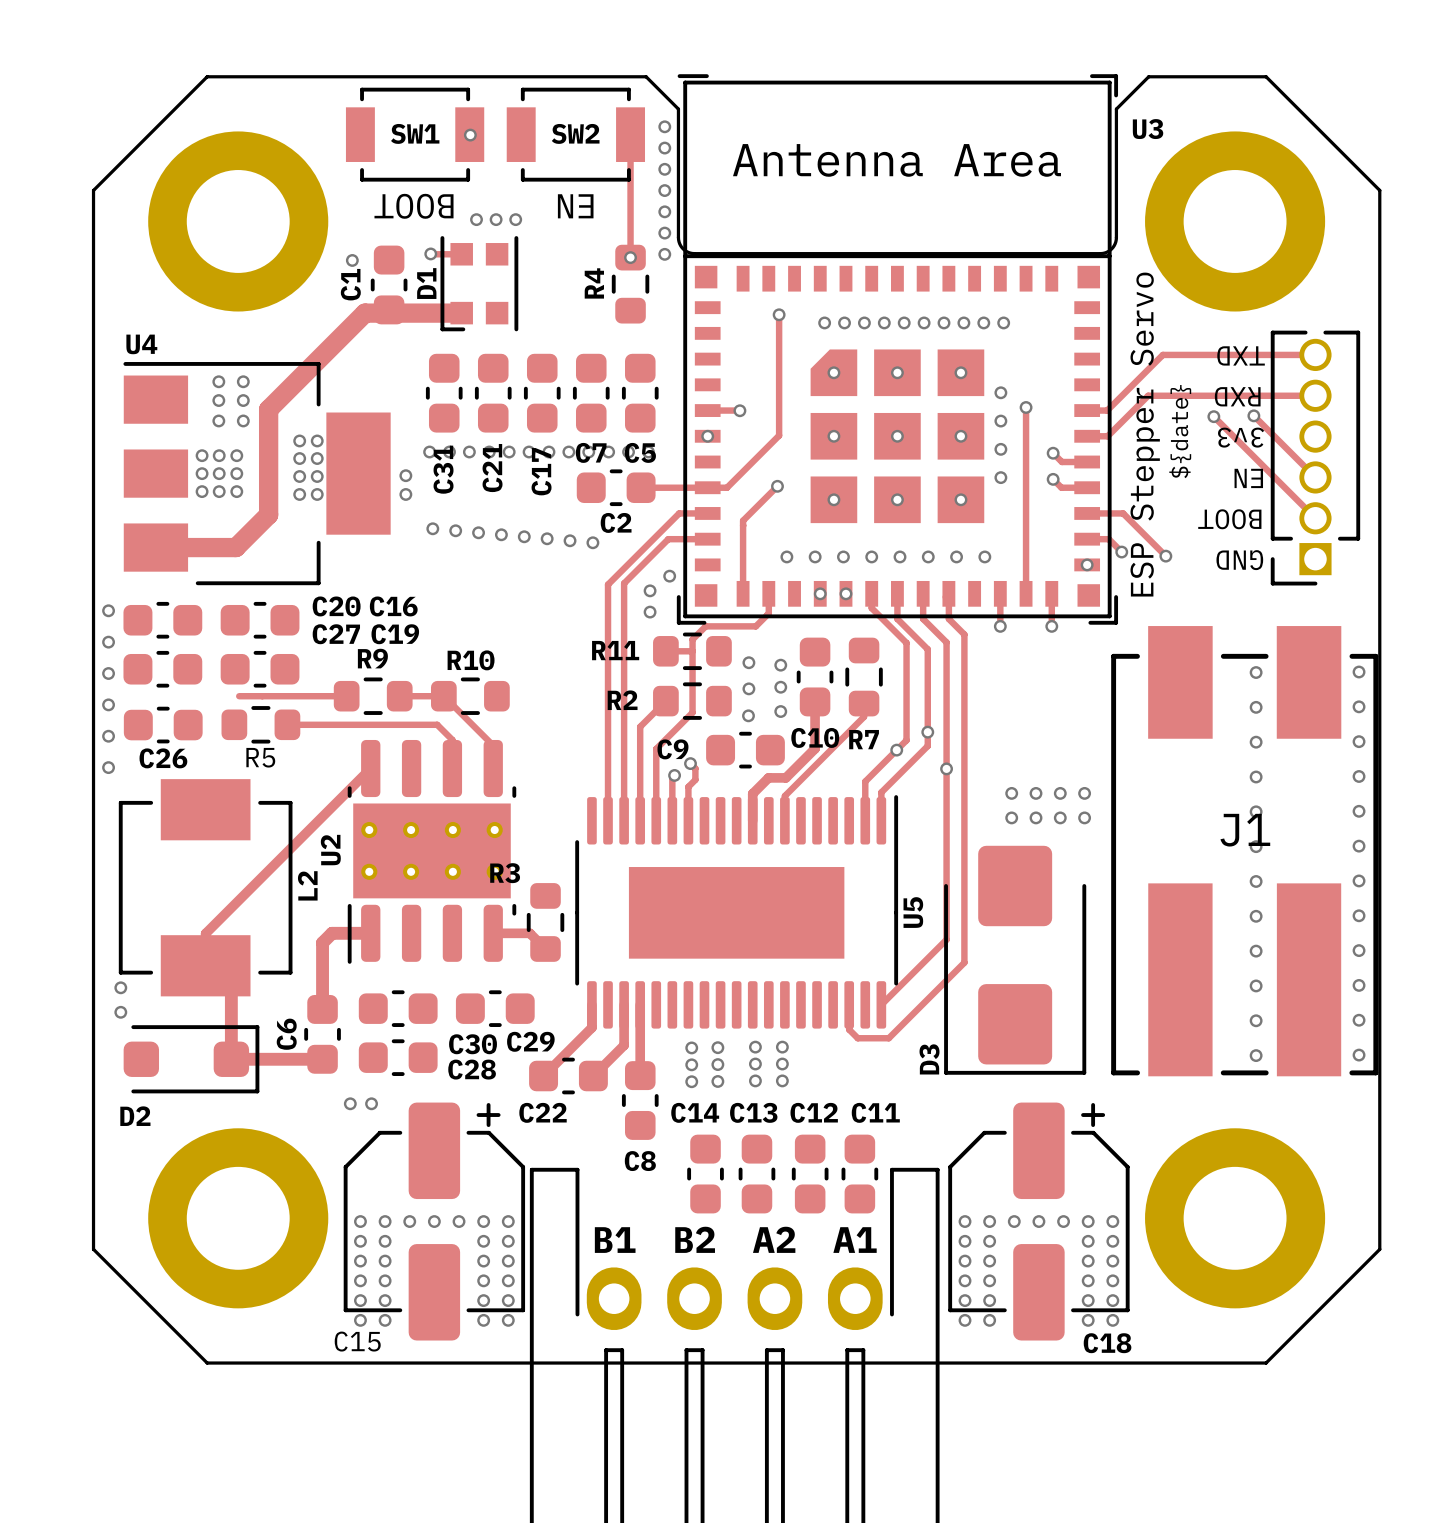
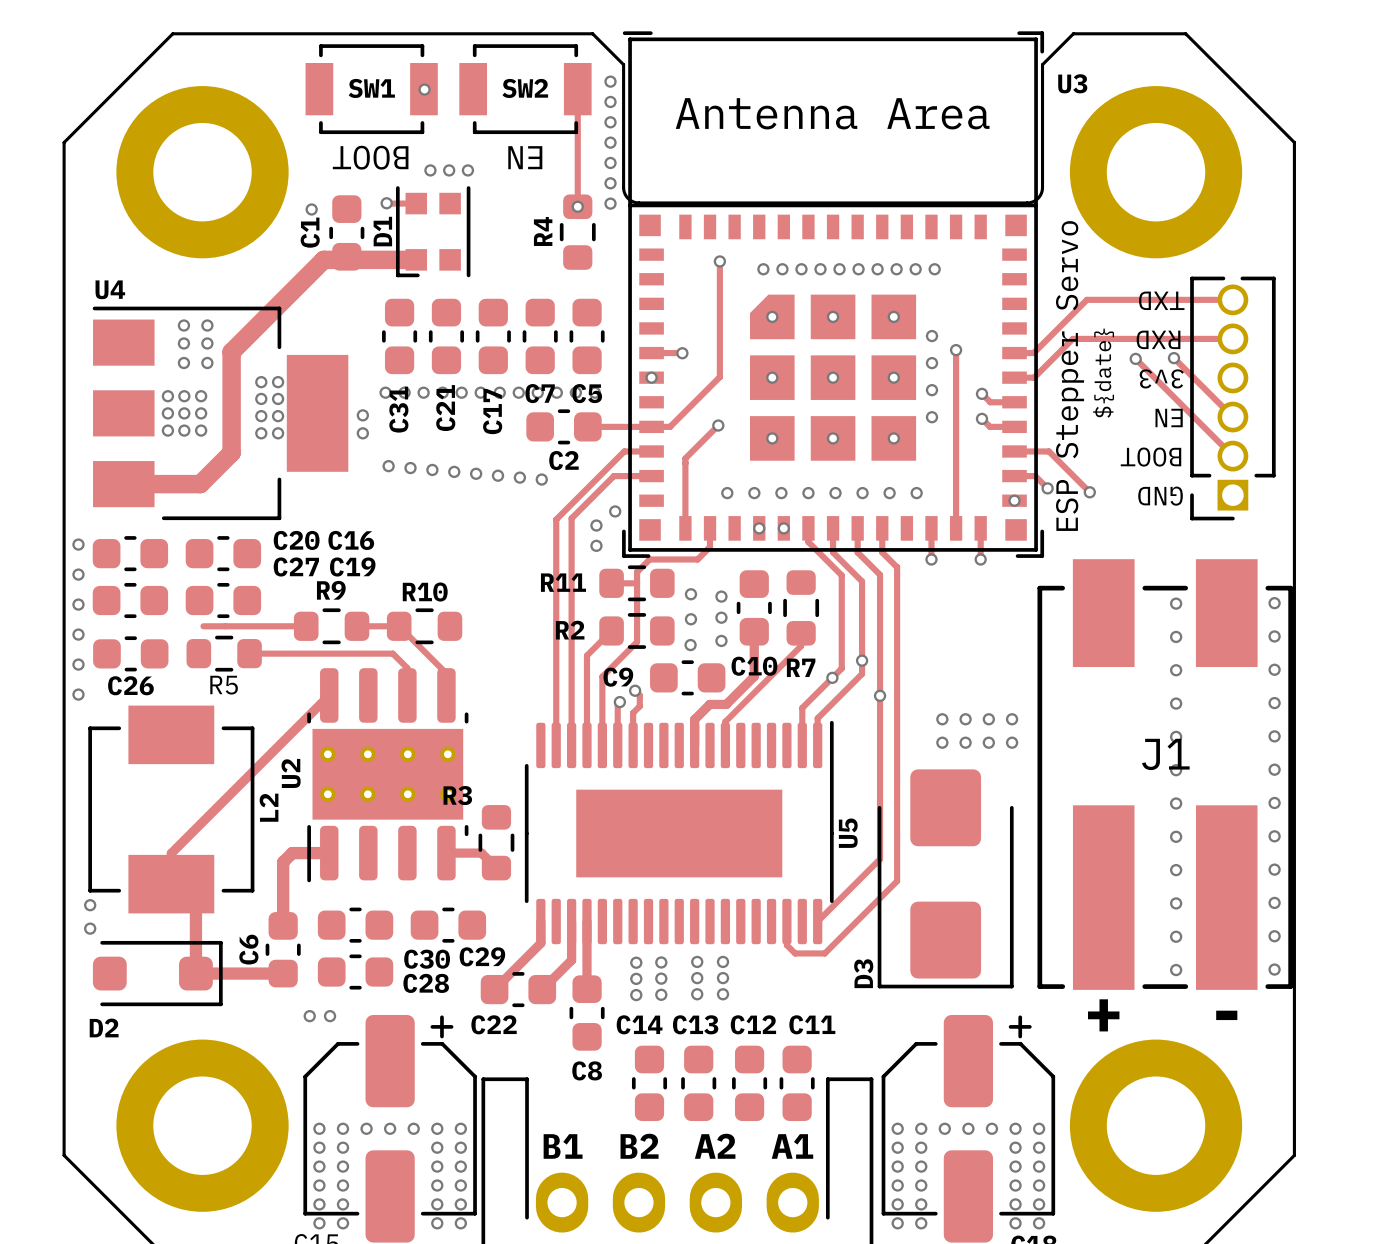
text: none -> + (1103, 1015)
text: none -> - (1226, 1015)

